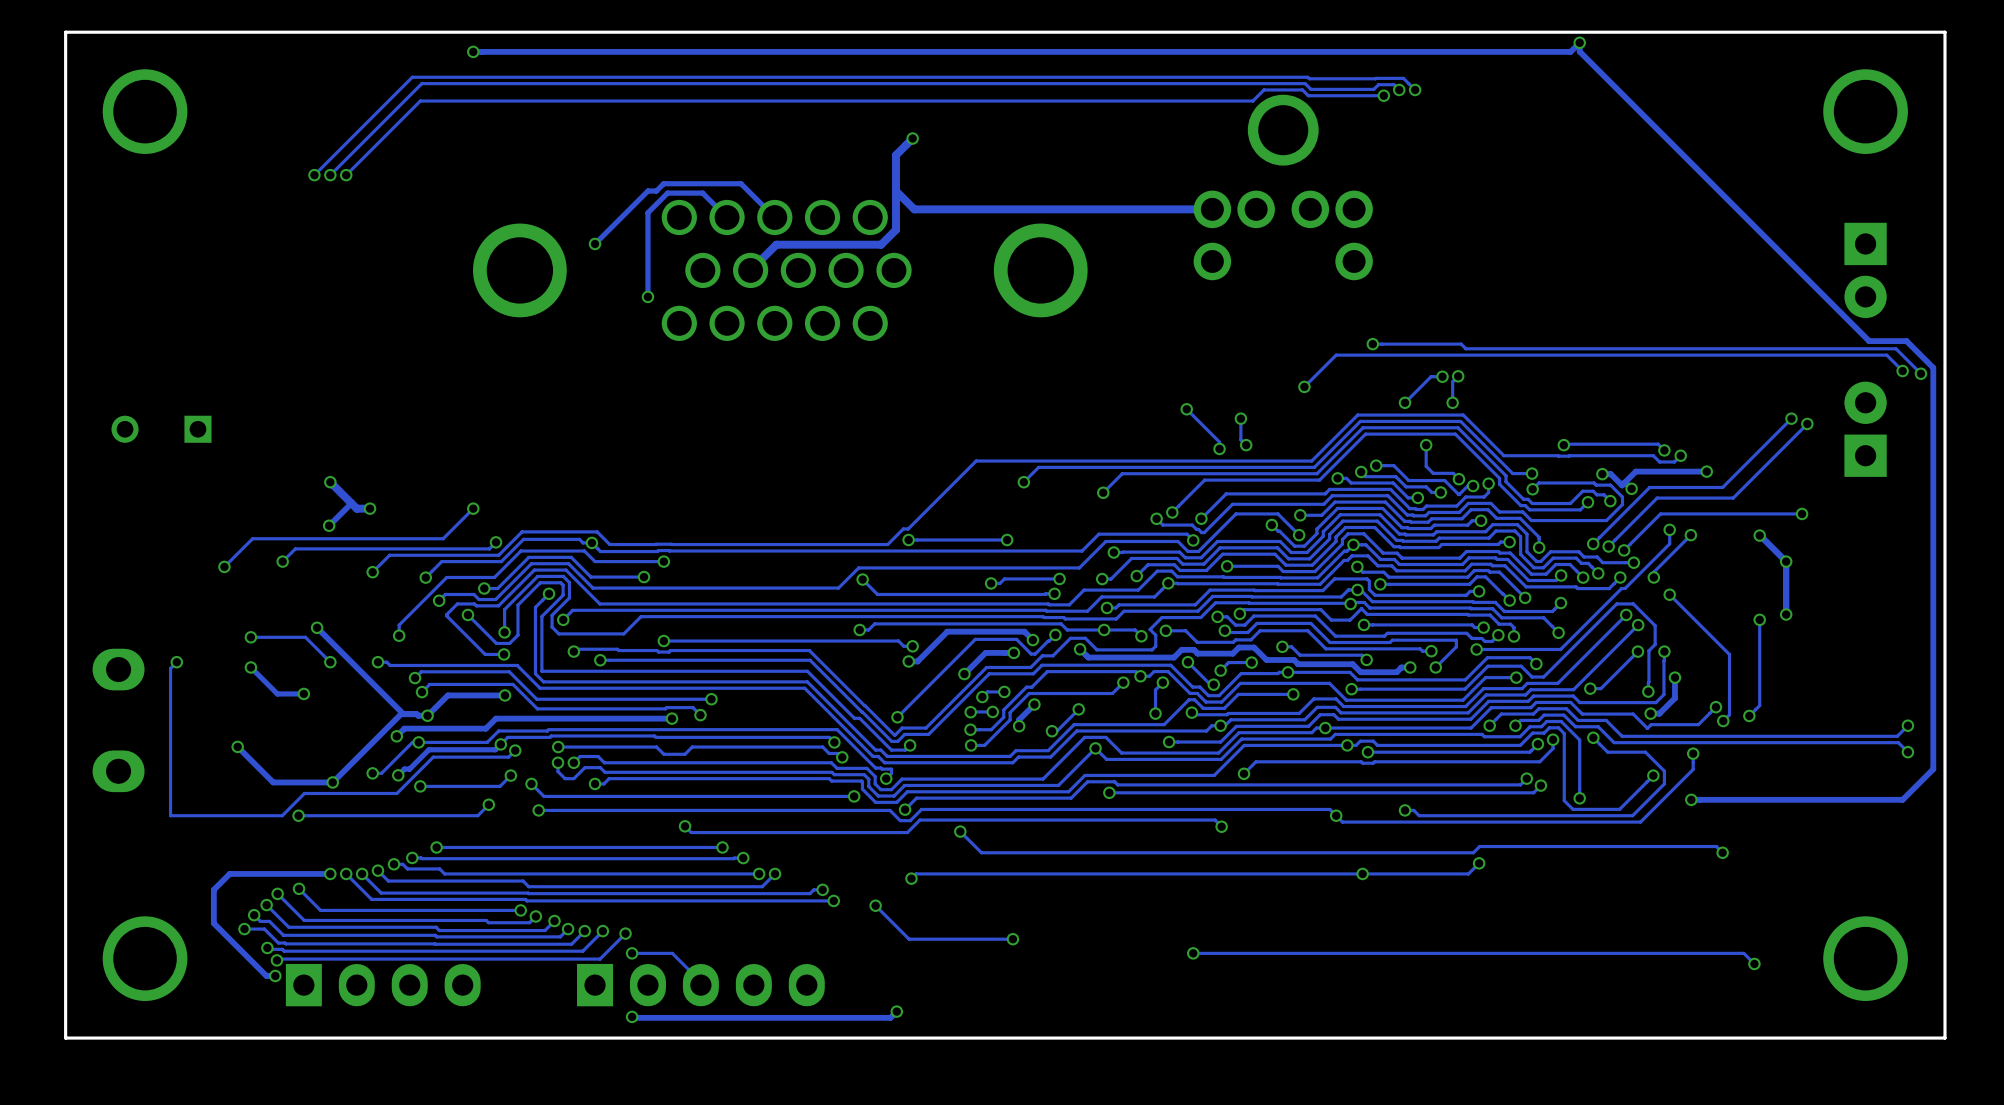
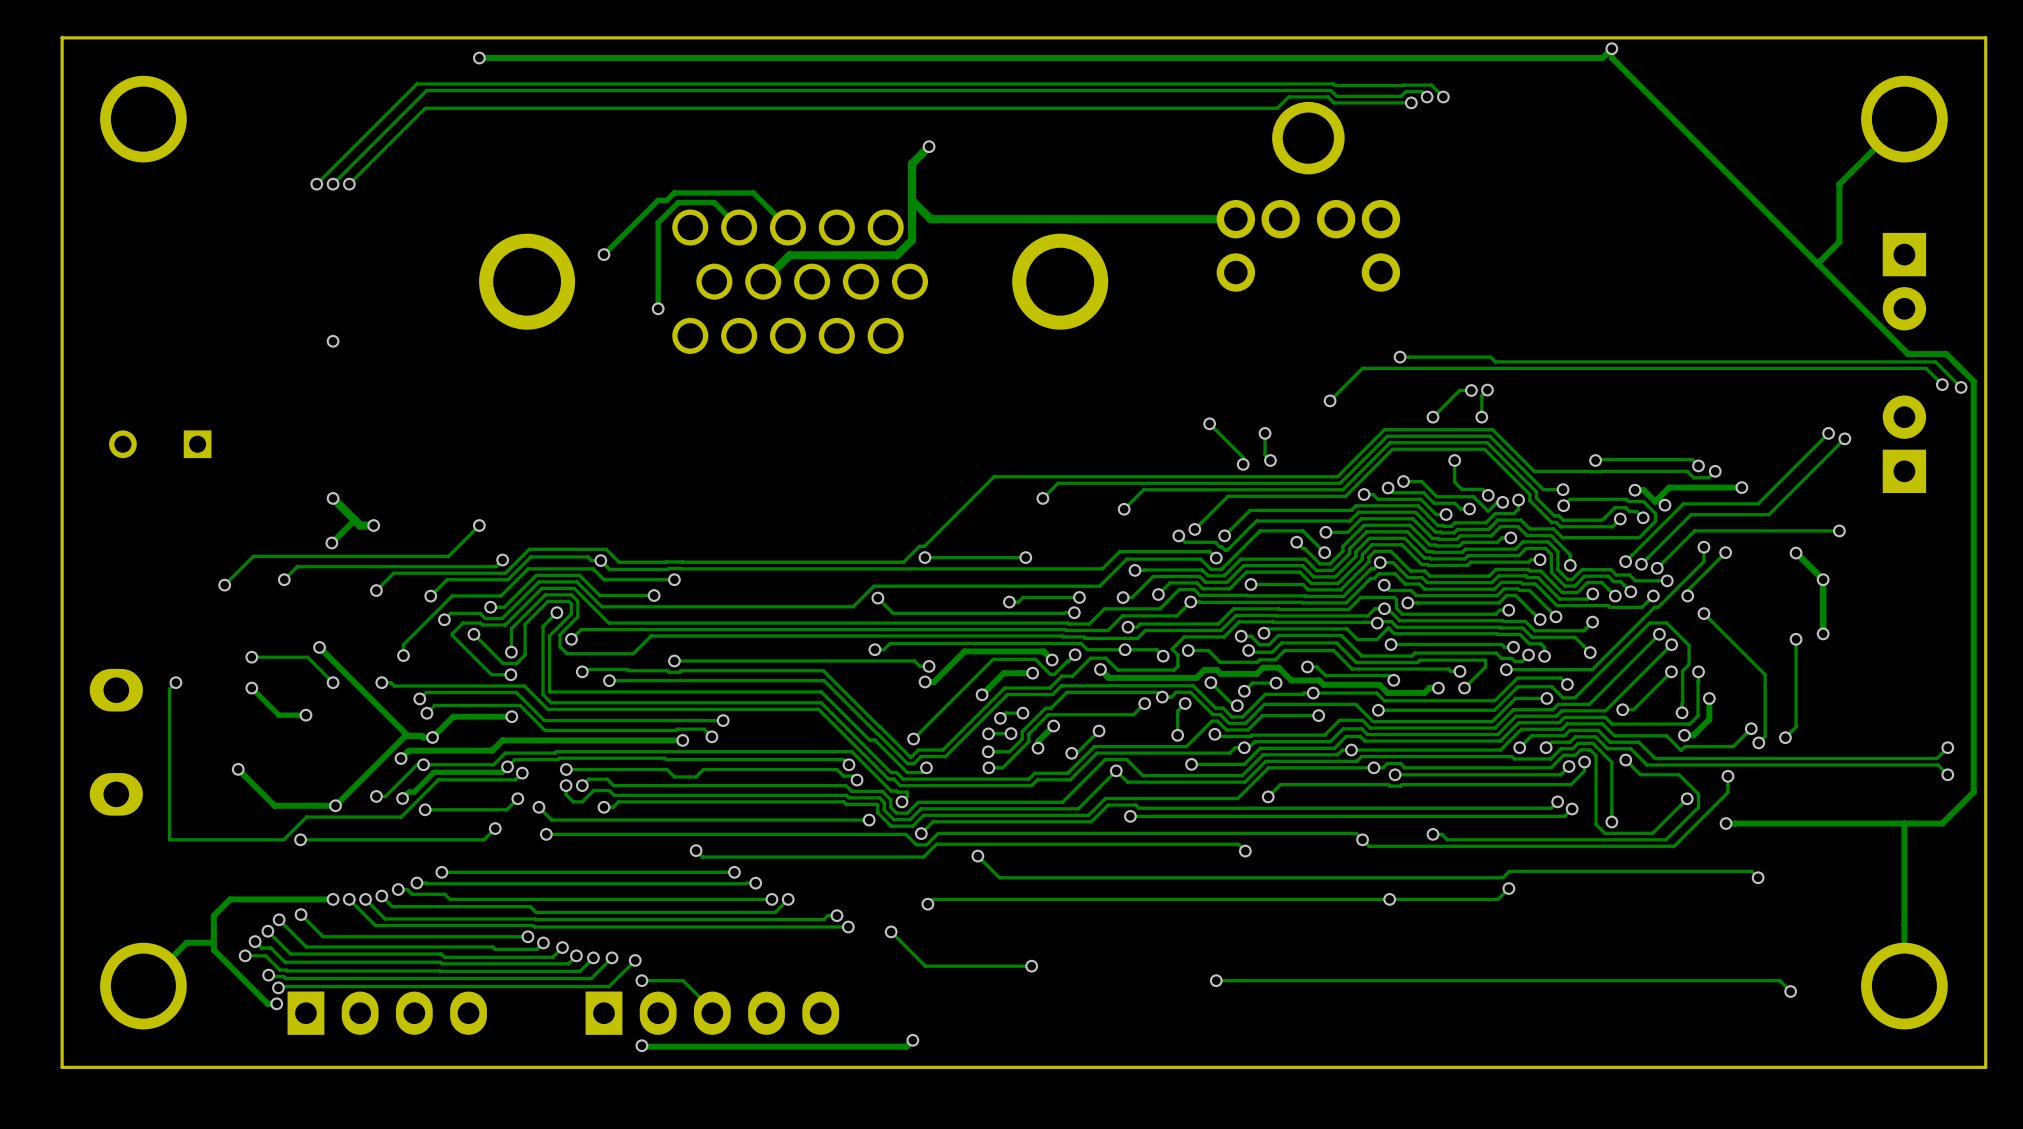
track: none -> (1904, 119) (1839, 184) (1839, 241) (1817, 263)
via: none -> (333, 341)
track: none -> (1904, 823) (1904, 986)
track: none -> (213, 942) (186, 942) (143, 986)

